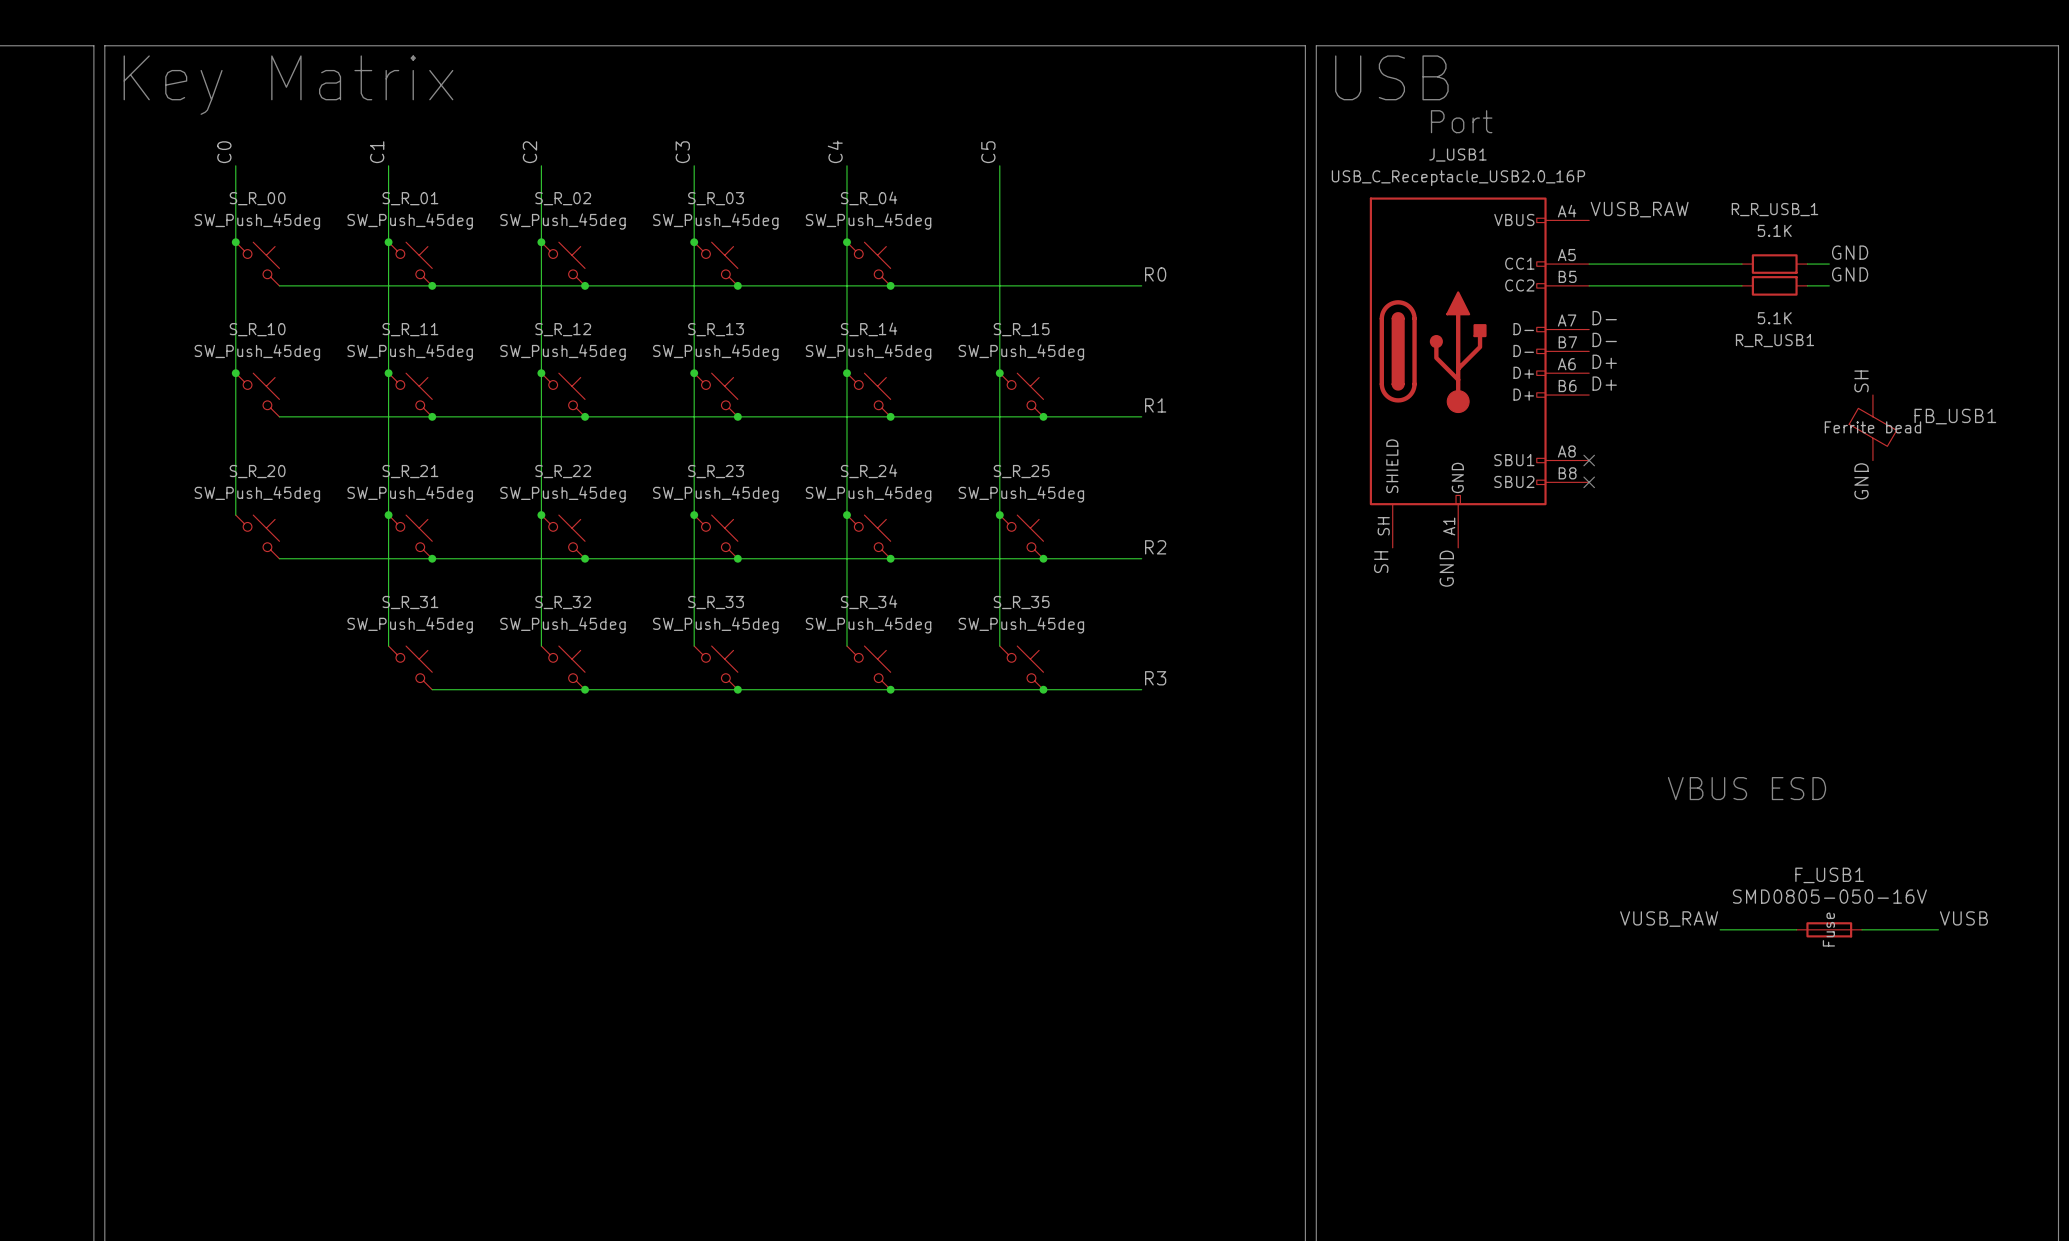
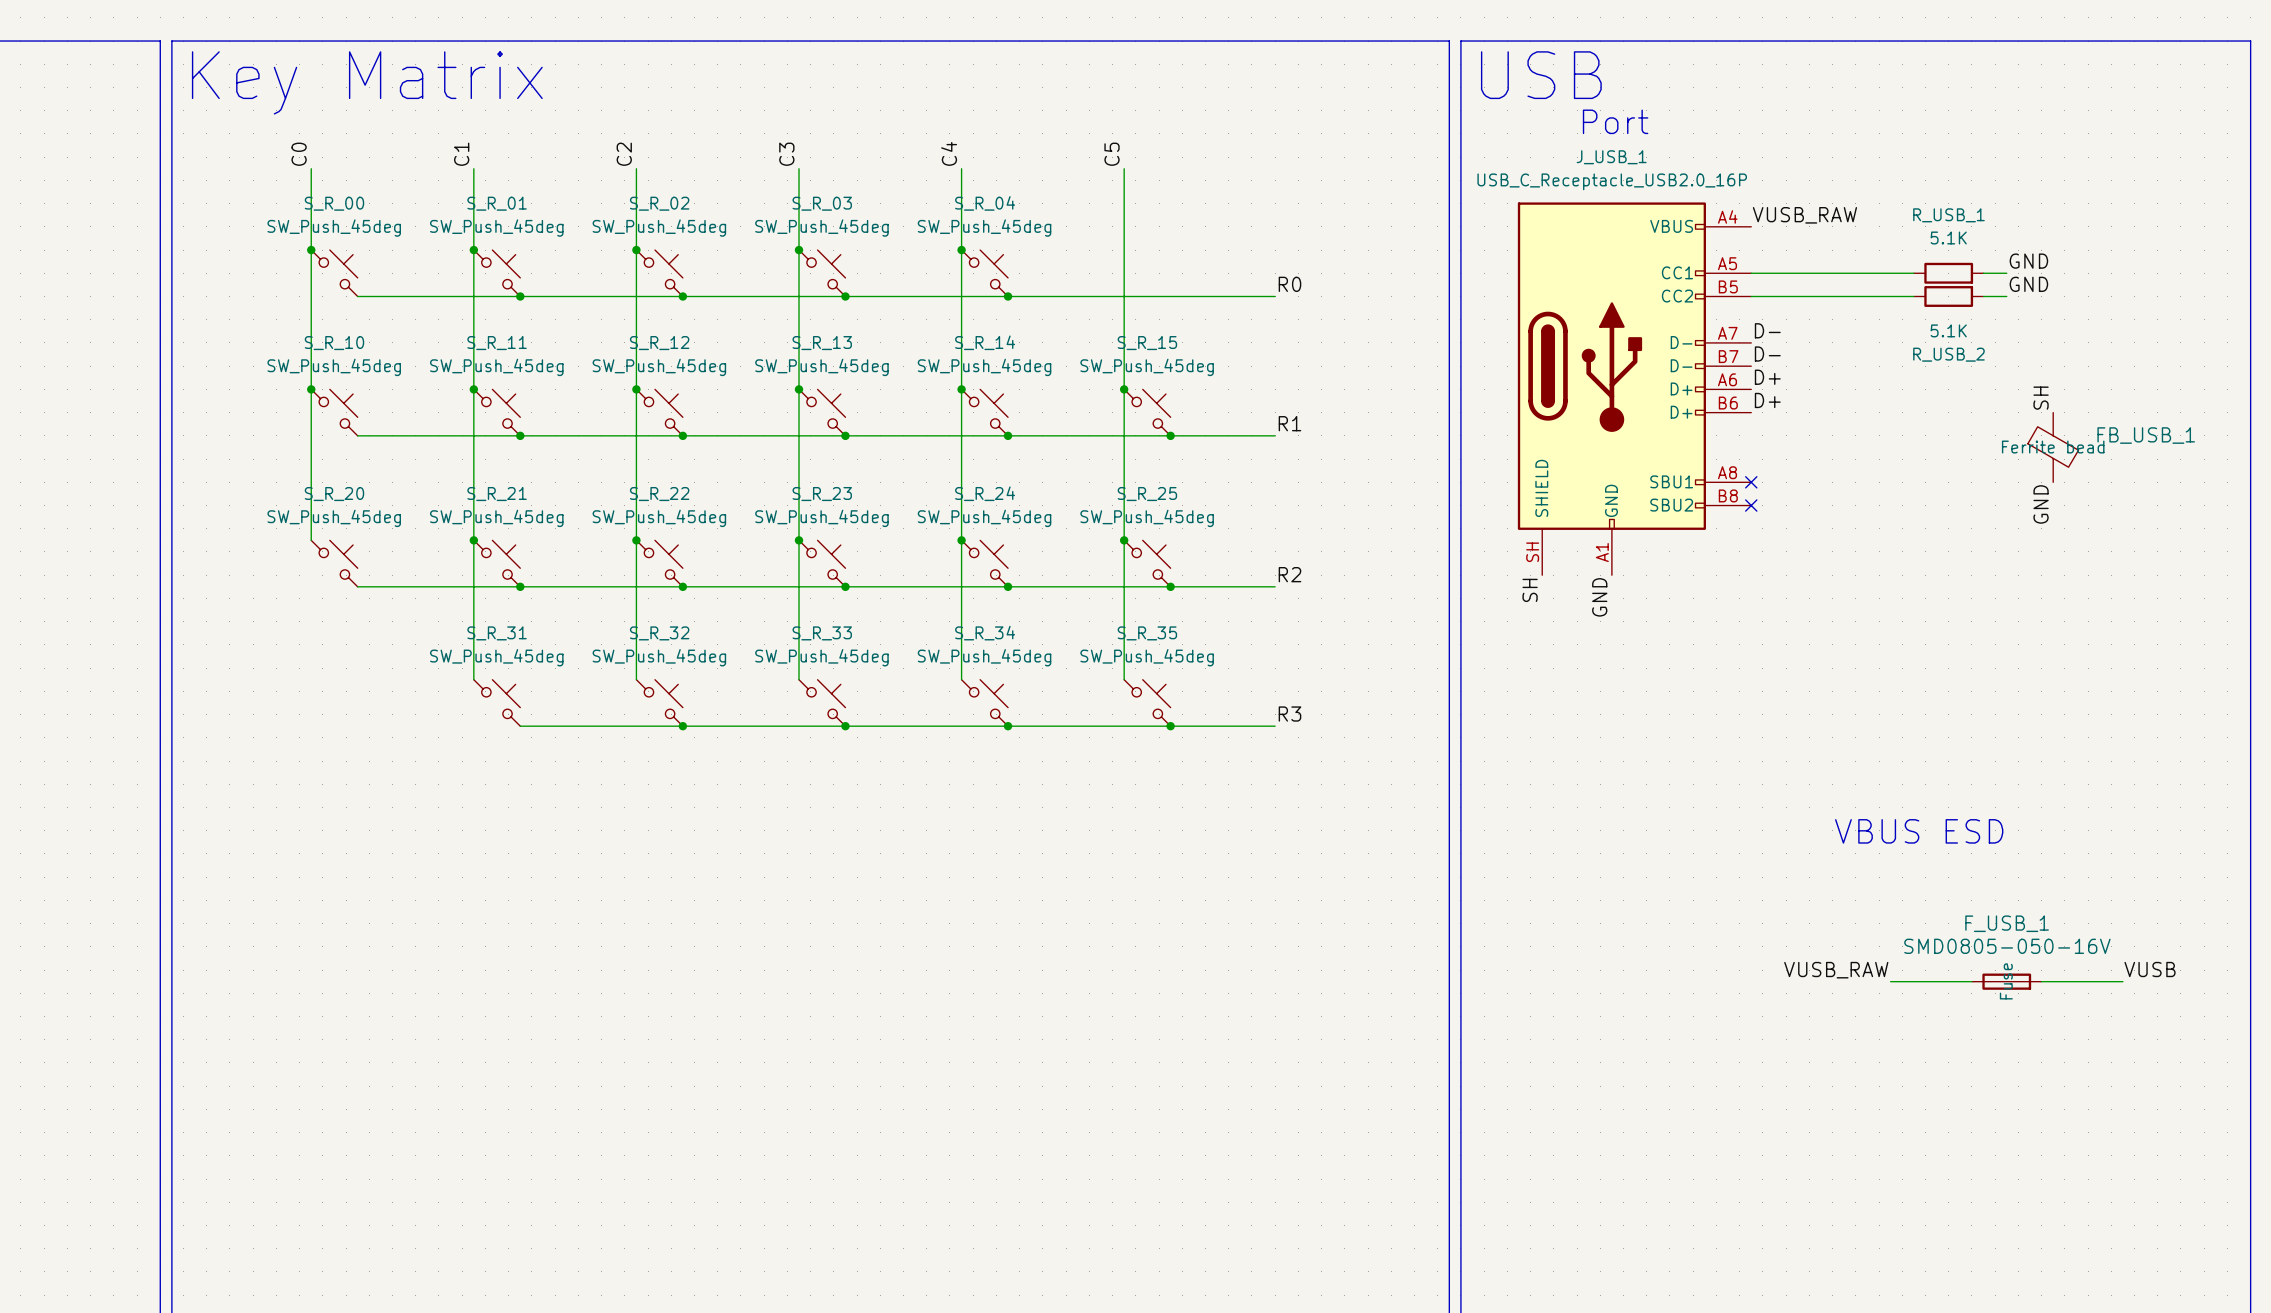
J_USB1 name: J_USB1 (1457, 155) -> J_USB_1 (1611, 157)
R_R_USB_1 name: R_R_USB_1 (1774, 209) -> R_USB_1 (1948, 215)
R_R_USB1 name: R_R_USB1 (1774, 340) -> R_USB_2 (1948, 354)
FB_USB1 name: FB_USB1 (1955, 416) -> FB_USB_1 (2146, 435)
F_USB1 name: F_USB1 (1829, 875) -> F_USB_1 (2007, 923)

